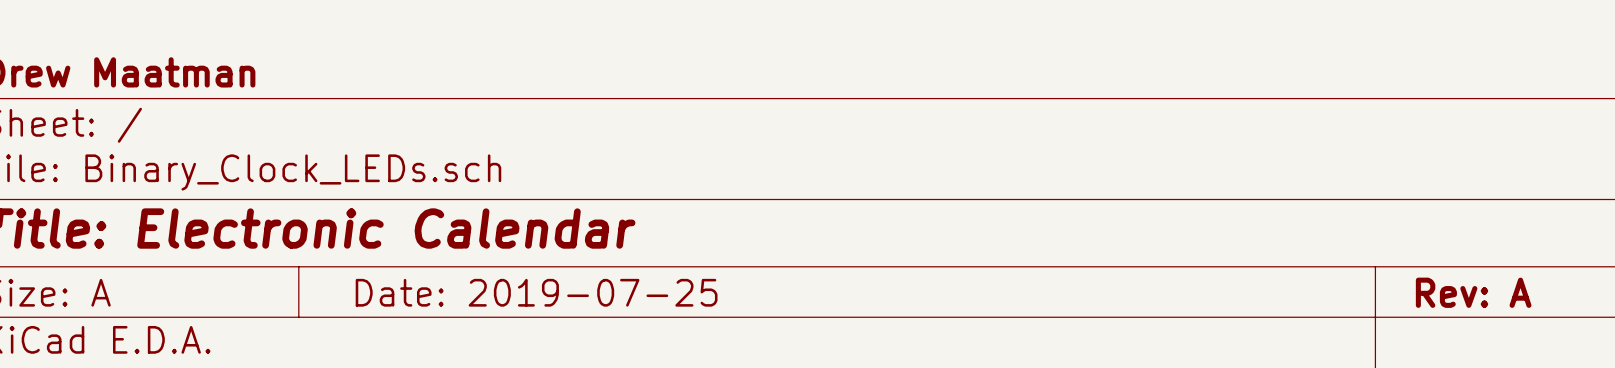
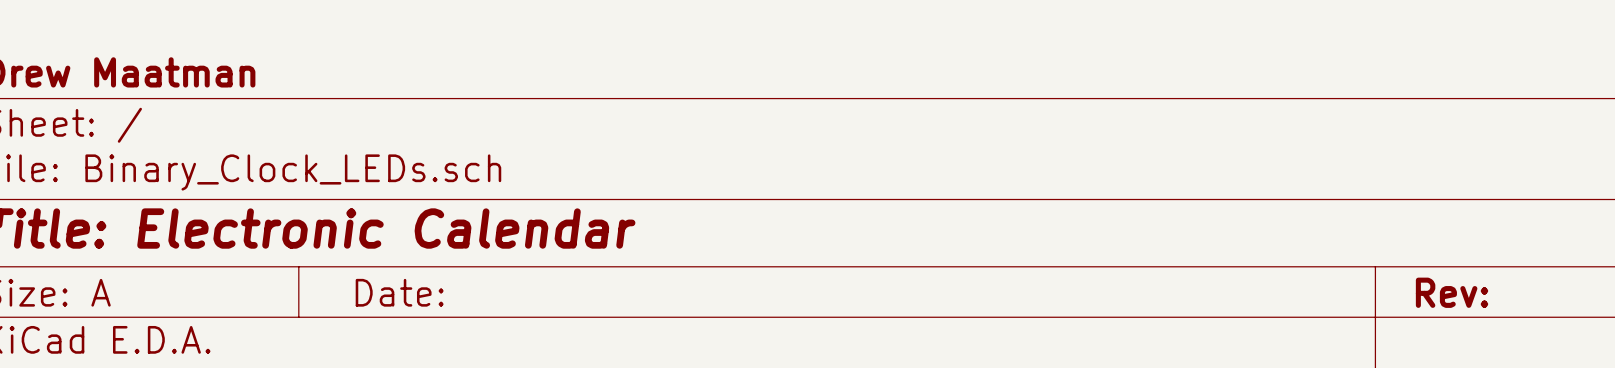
title block: Date: 2019-07-25 (536, 292) -> Date: (399, 292)
title block: Rev: A (1473, 292) -> Rev: (1452, 292)

